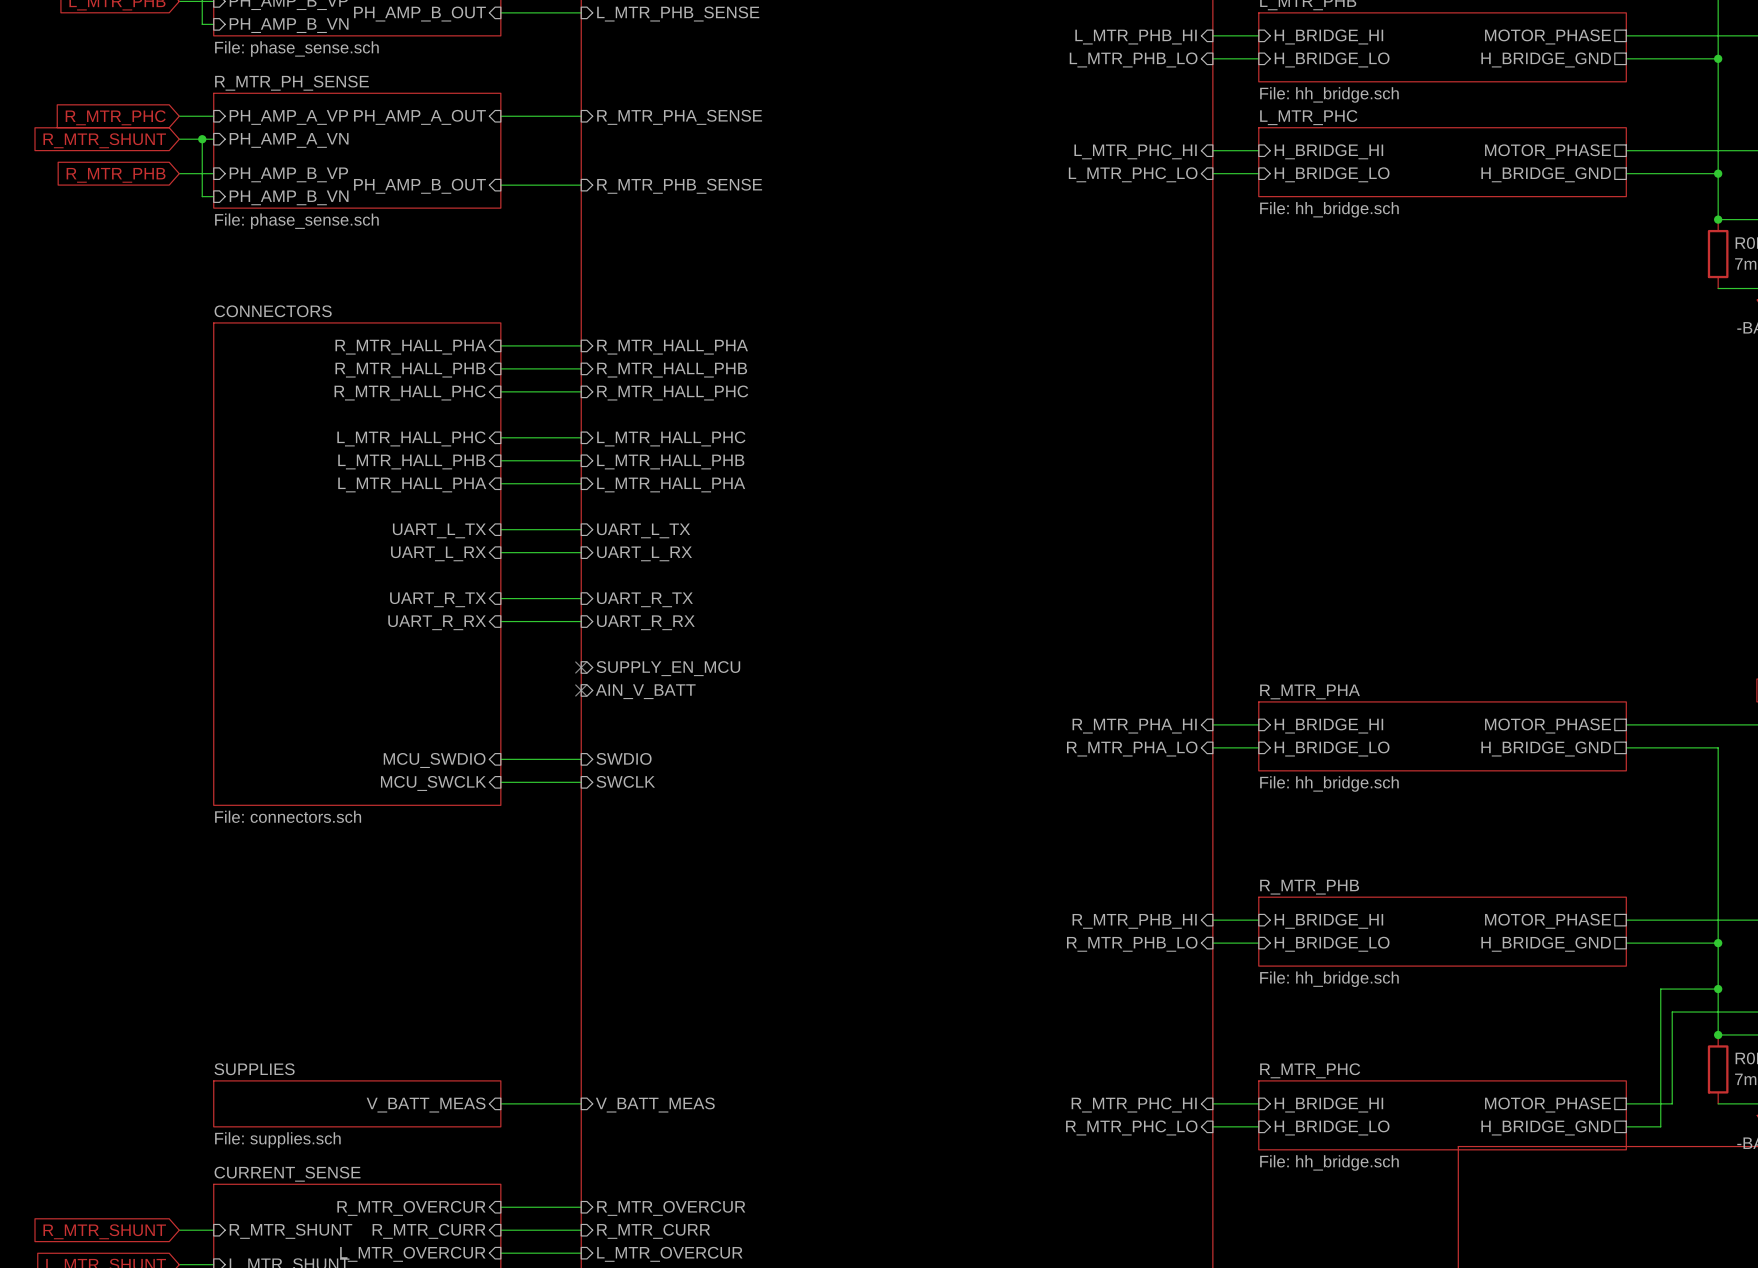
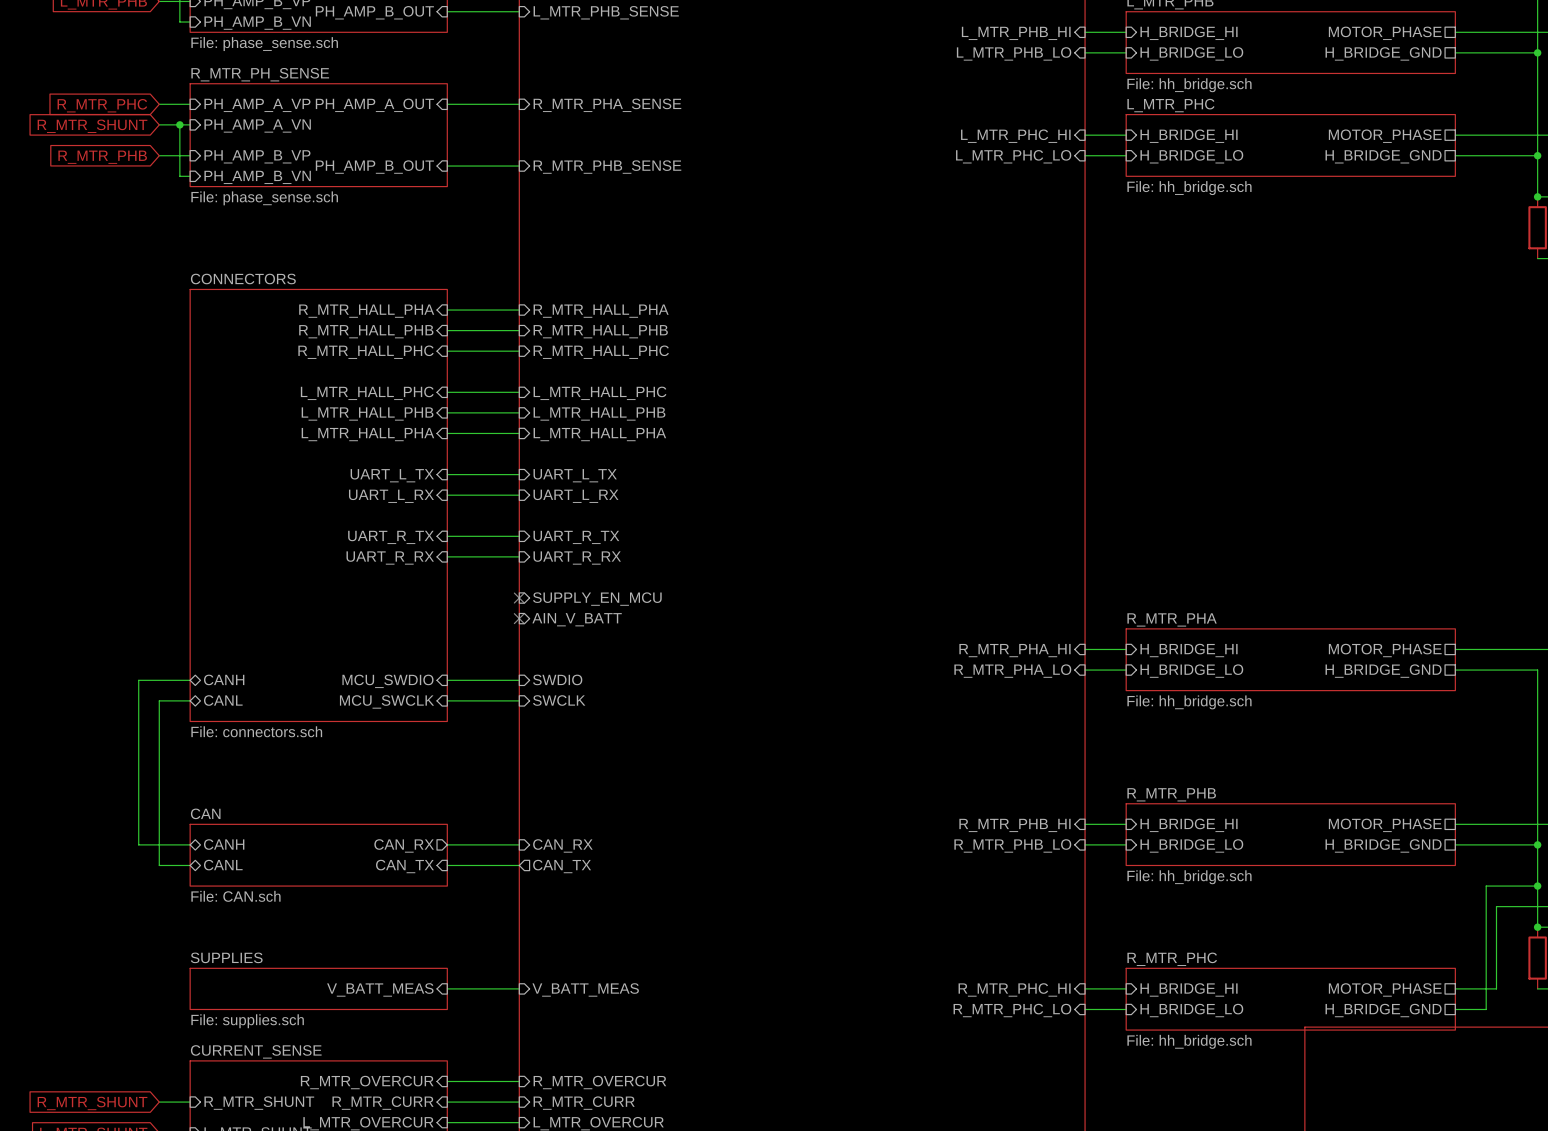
sheet pin: none -> CANH (224, 679)
wire: none -> (190, 680) (138, 680) (138, 844) (190, 844)
sheet pin: none -> CANL (223, 700)
wire: none -> (190, 700) (159, 700) (159, 865) (190, 865)
sheet pin: none -> CANH (224, 844)
wire: none -> (447, 844) (519, 844)
sheet pin: none -> CAN_RX (404, 845)
sheet pin: none -> CAN_RX (562, 845)
sheet CAN: none -> File: CAN.sch (318, 855)
sheet pin: none -> CANL (223, 865)
wire: none -> (447, 865) (519, 865)
sheet pin: none -> CAN_TX (404, 866)
sheet pin: none -> CAN_TX (562, 866)

